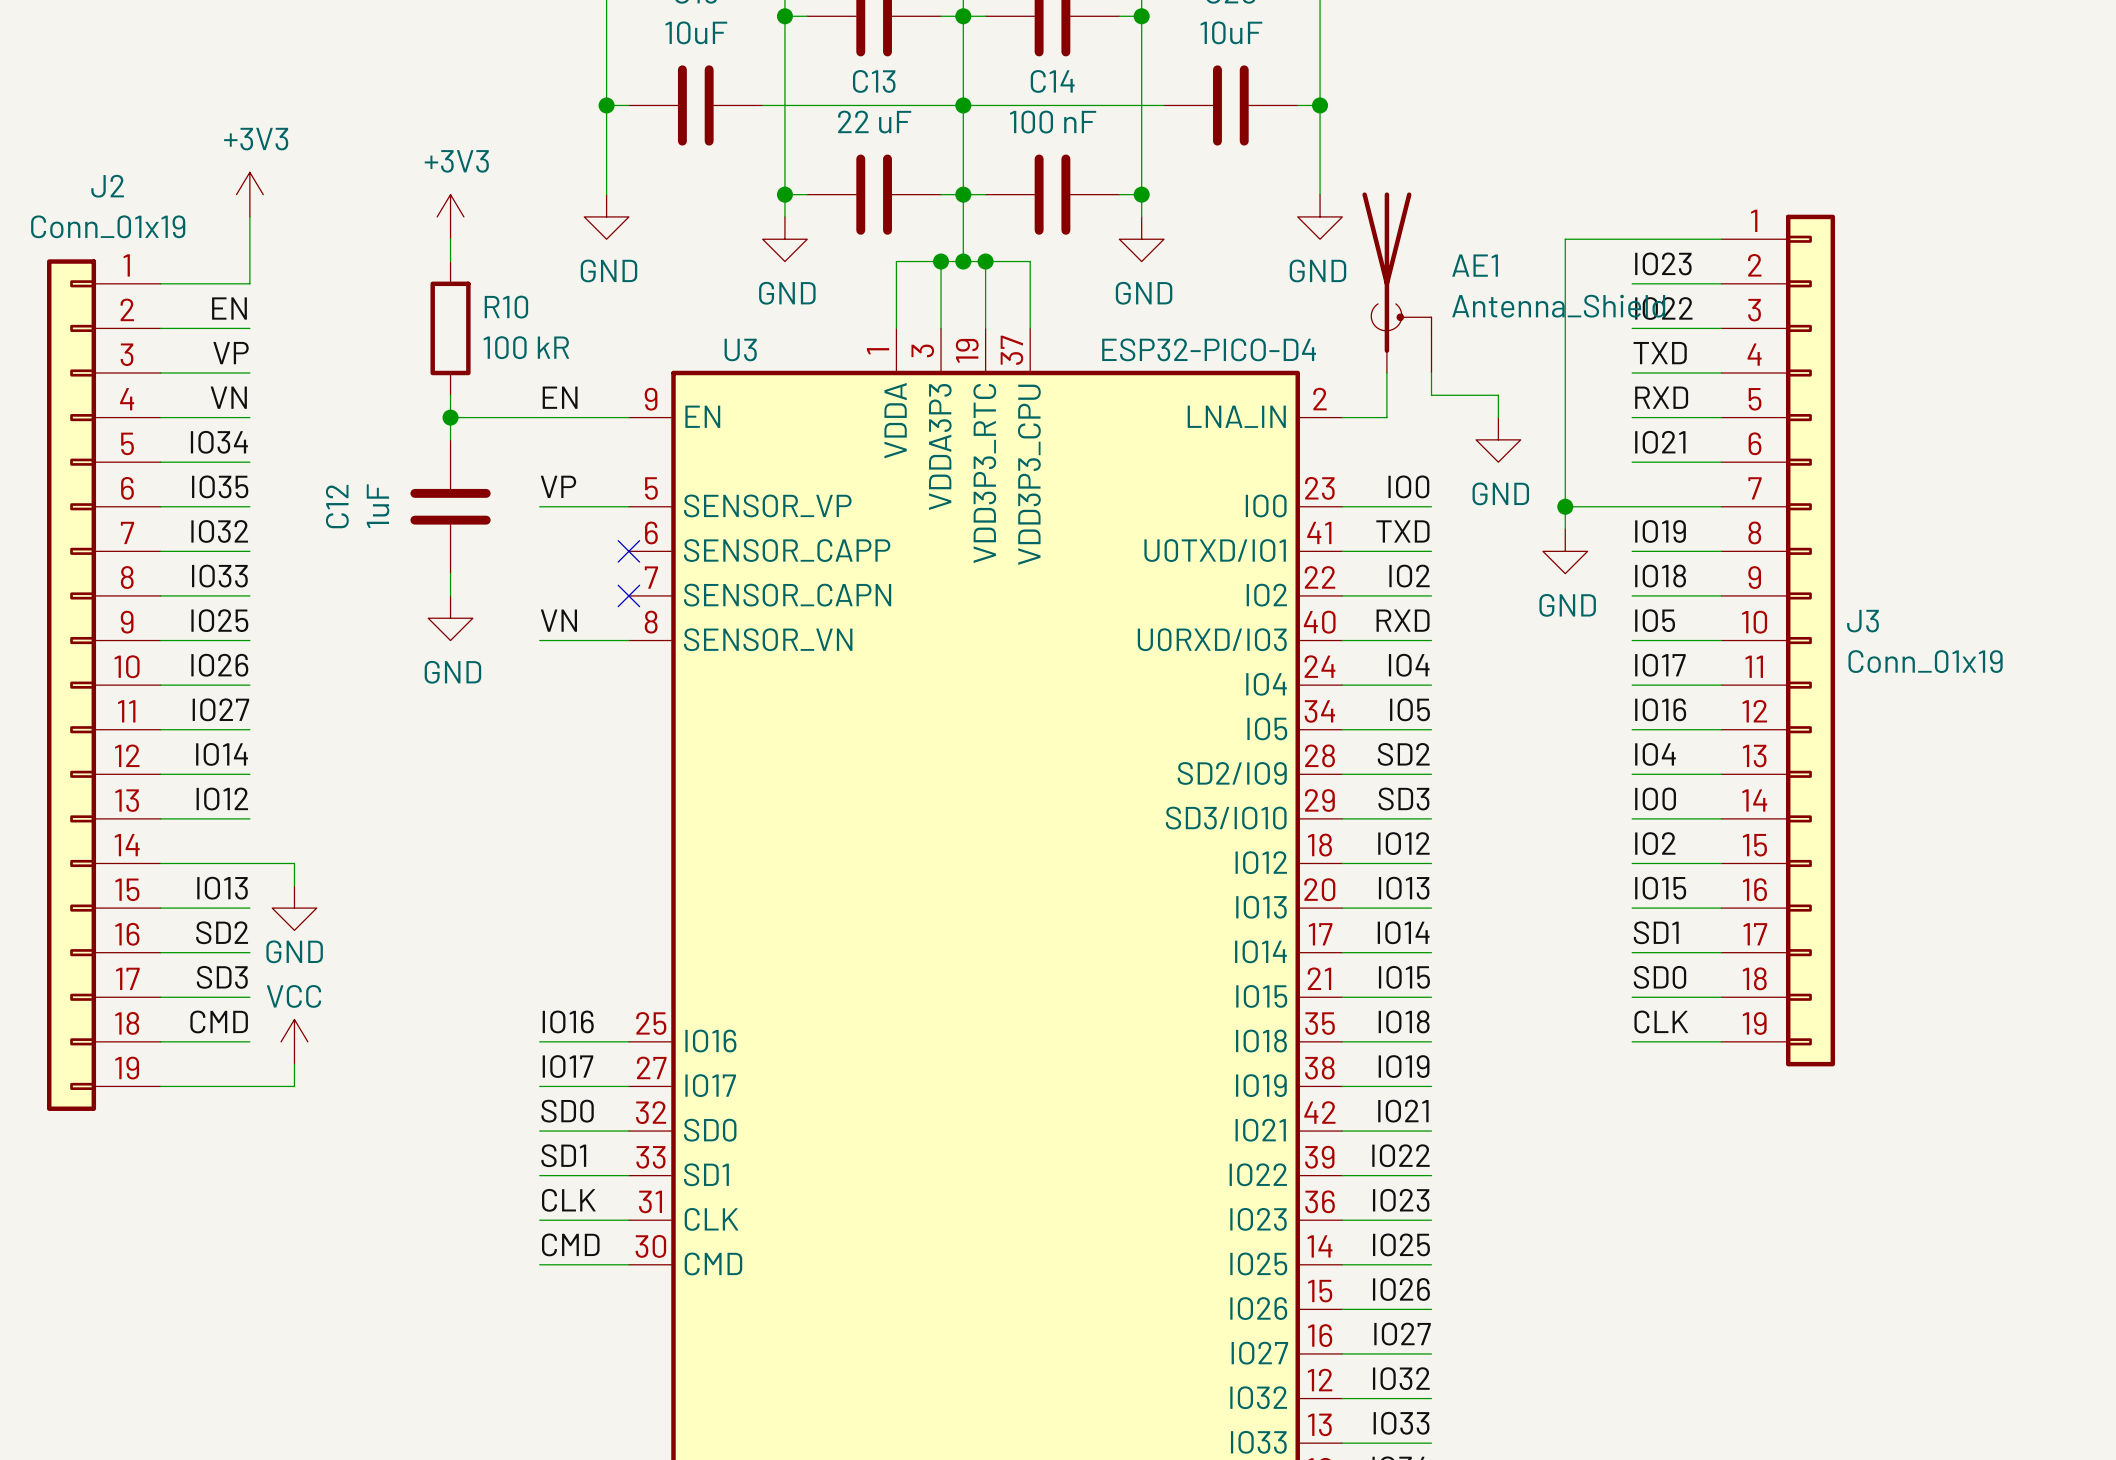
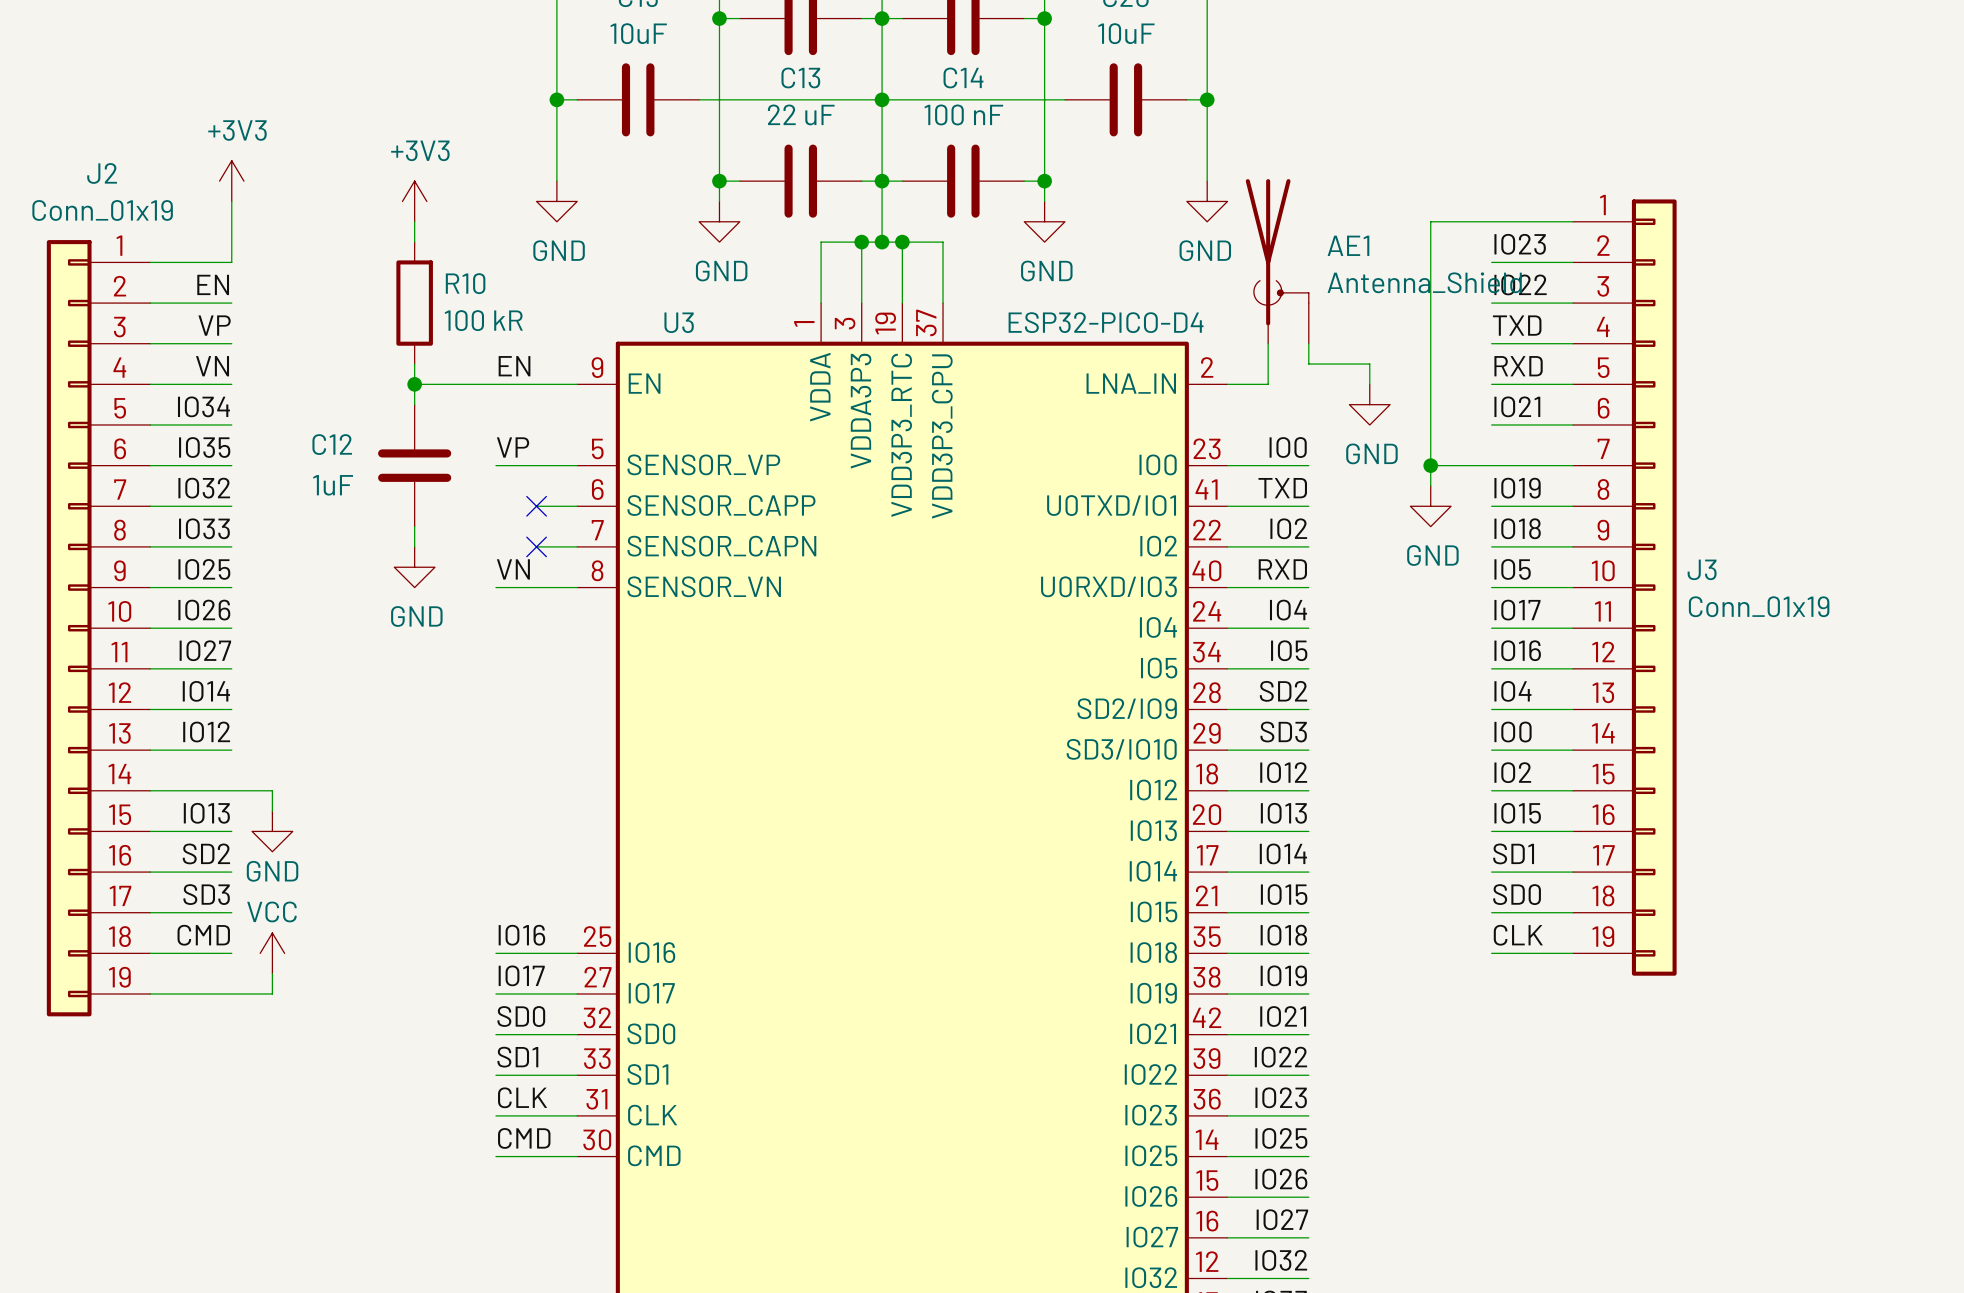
C12 name rotation: 0° (337, 506) -> 90° clockwise (332, 444)
C12 value rotation: 0° (378, 506) -> 90° clockwise (333, 485)
wire: none -> (536, 506) (577, 506)
no-connect mark: none -> (536, 506)
no-connect mark: (628, 551) -> none
wire: none -> (536, 546) (577, 546)
no-connect mark: none -> (536, 546)
no-connect mark: (628, 595) -> none

